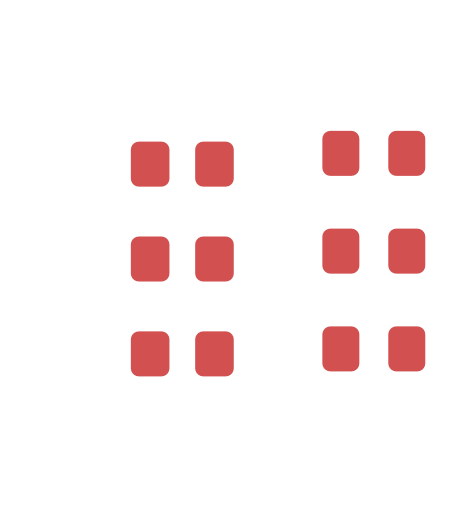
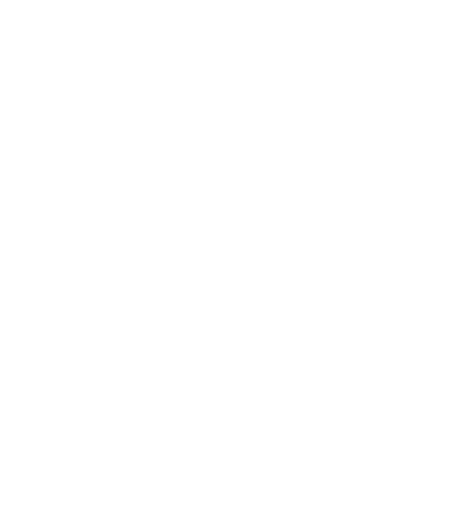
part: (373, 153) -> none
part: (182, 164) -> none
part: (373, 251) -> none
part: (182, 259) -> none
part: (373, 348) -> none
part: (182, 353) -> none

